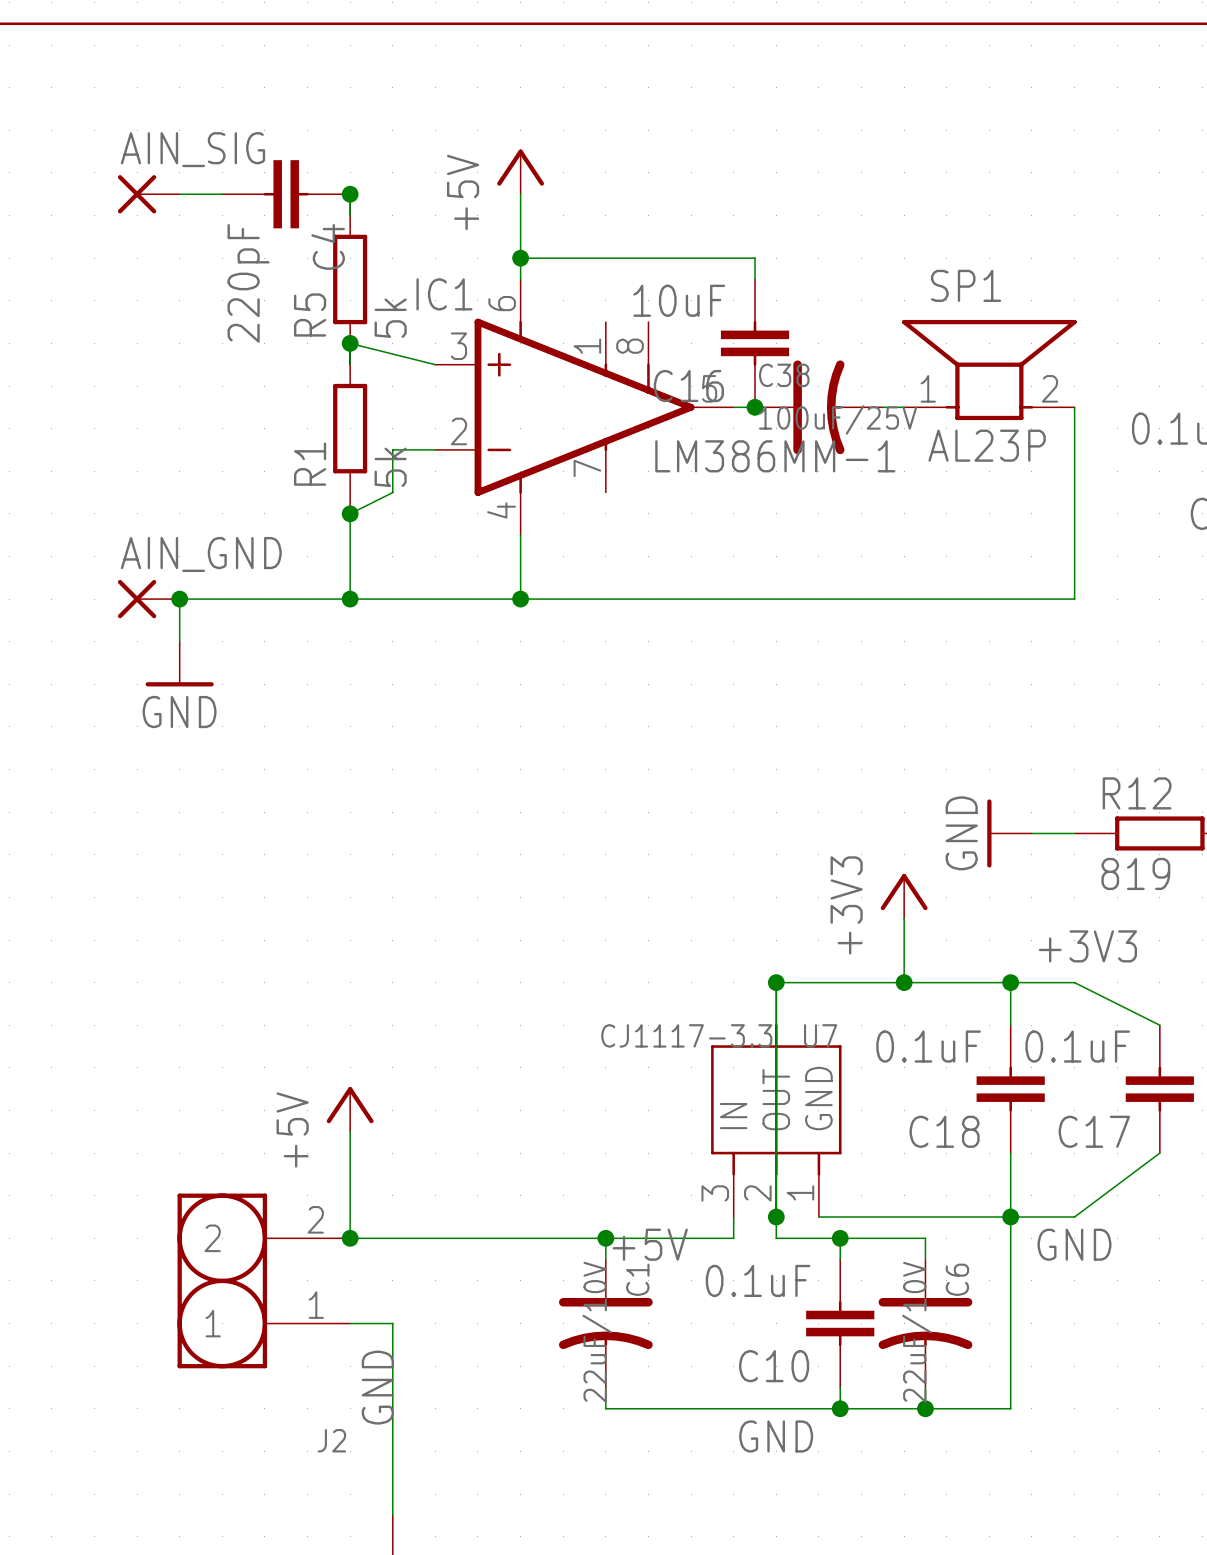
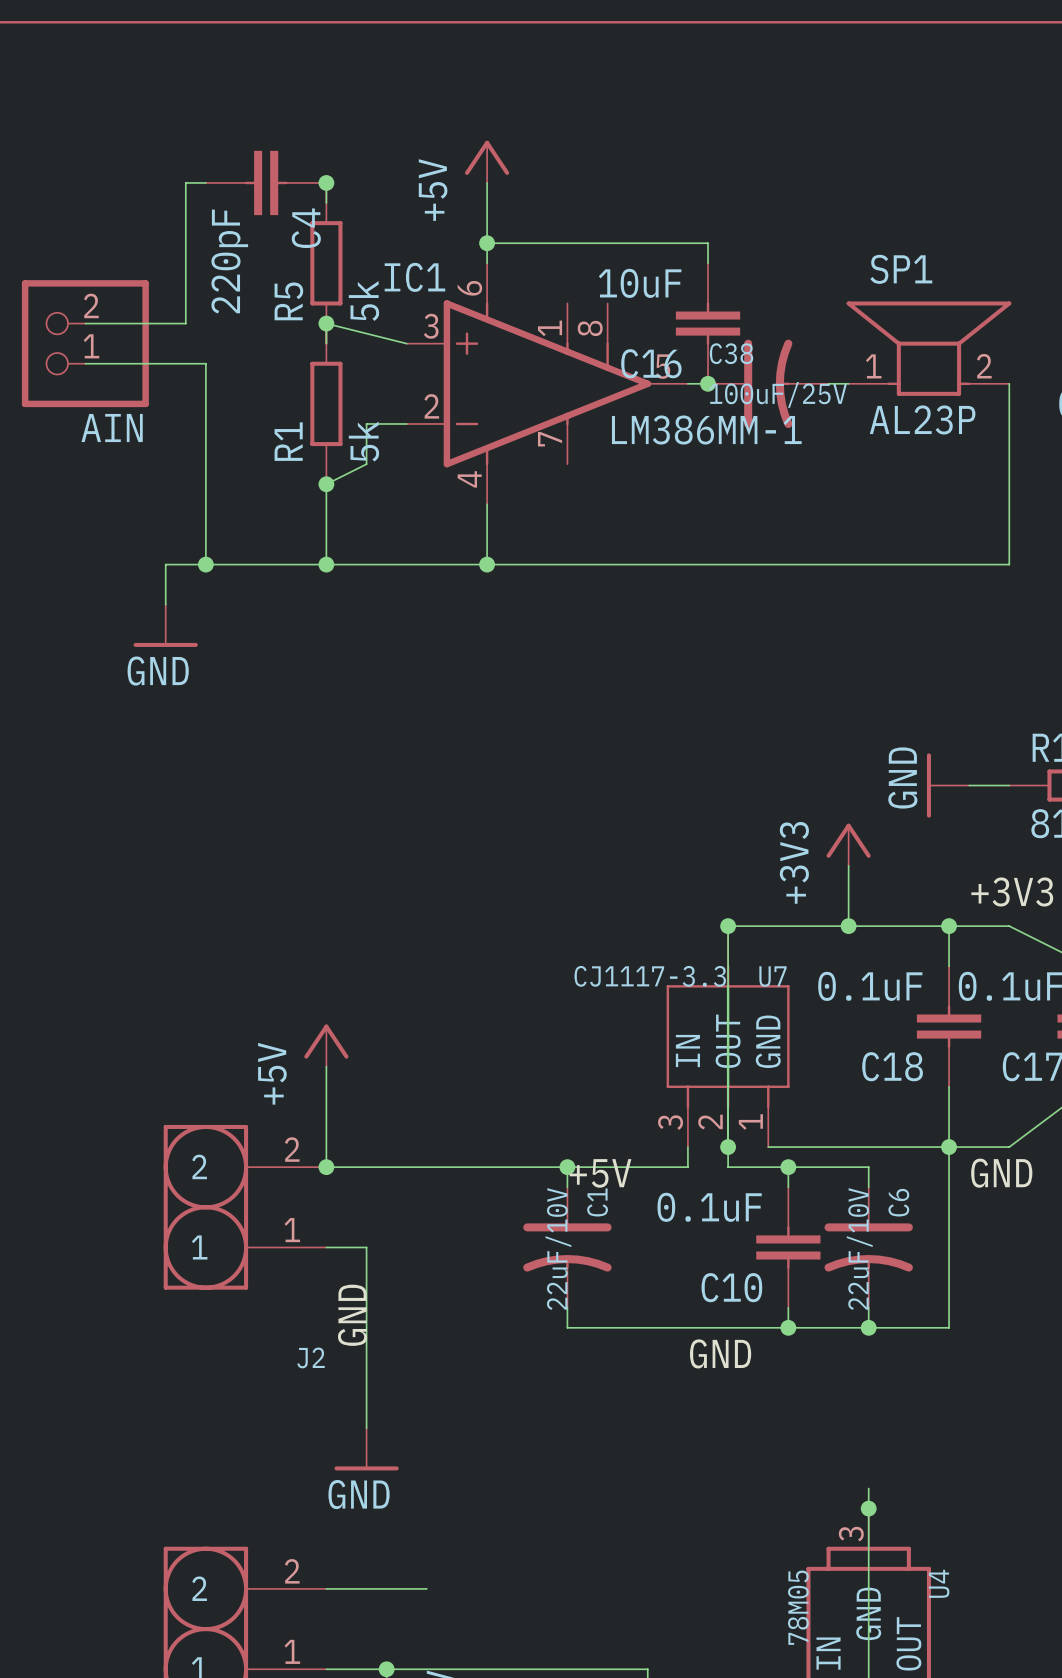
AIN_SIG: (148, 194) -> none
wire: (179, 194) (201, 194) -> (85, 323) (185, 323) (185, 182)
AIN: none -> (85, 343)
wire: none -> (85, 363) (205, 363) (205, 564)
AIN_GND: (148, 599) -> none
junction position: (179, 599) -> (205, 564)

